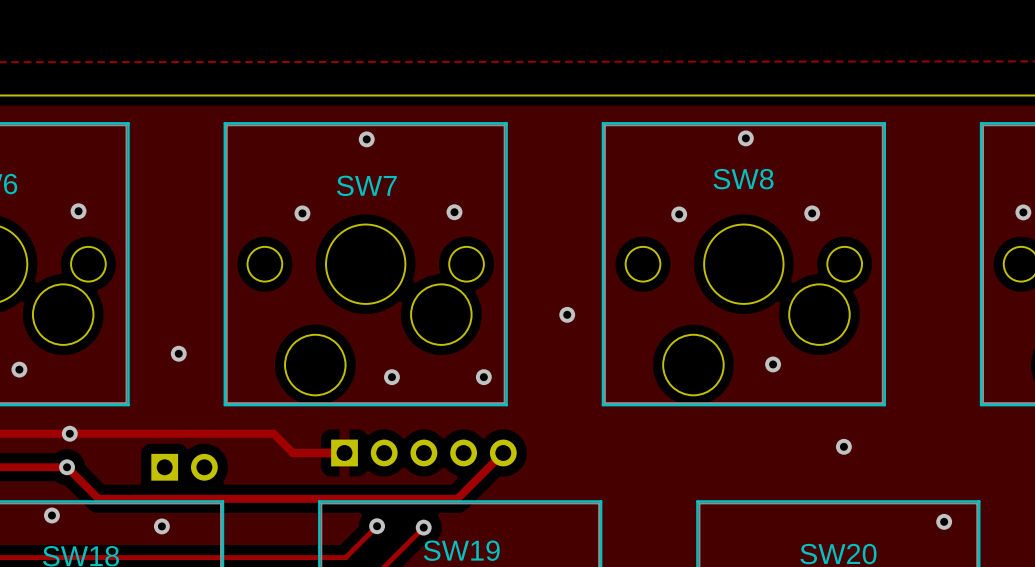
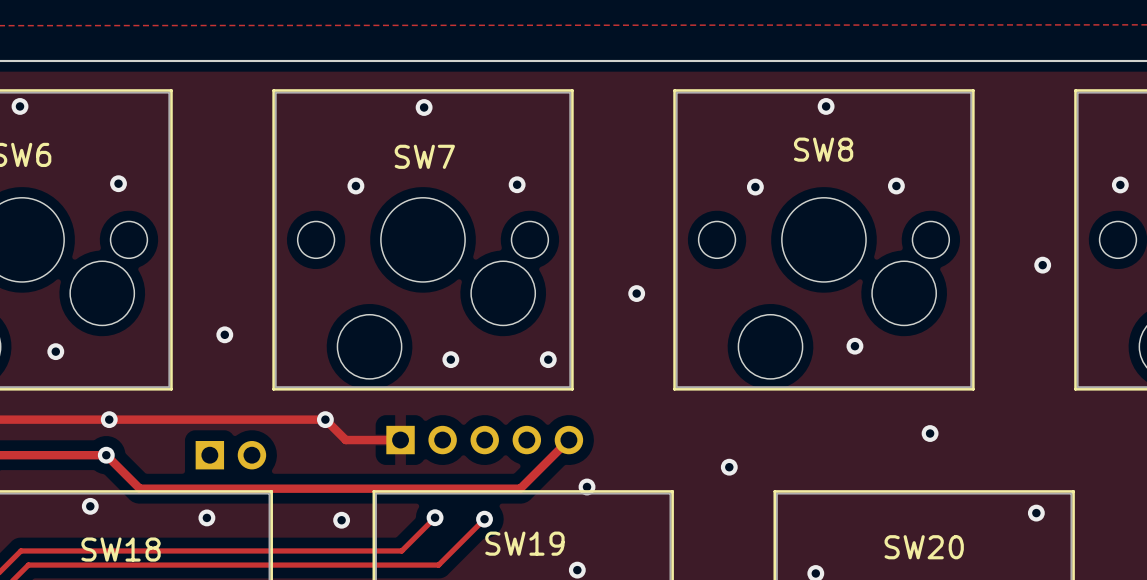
via: none -> (1042, 265)
via: none -> (325, 419)
via: none -> (729, 467)
via: none -> (587, 486)
via: none -> (341, 520)

